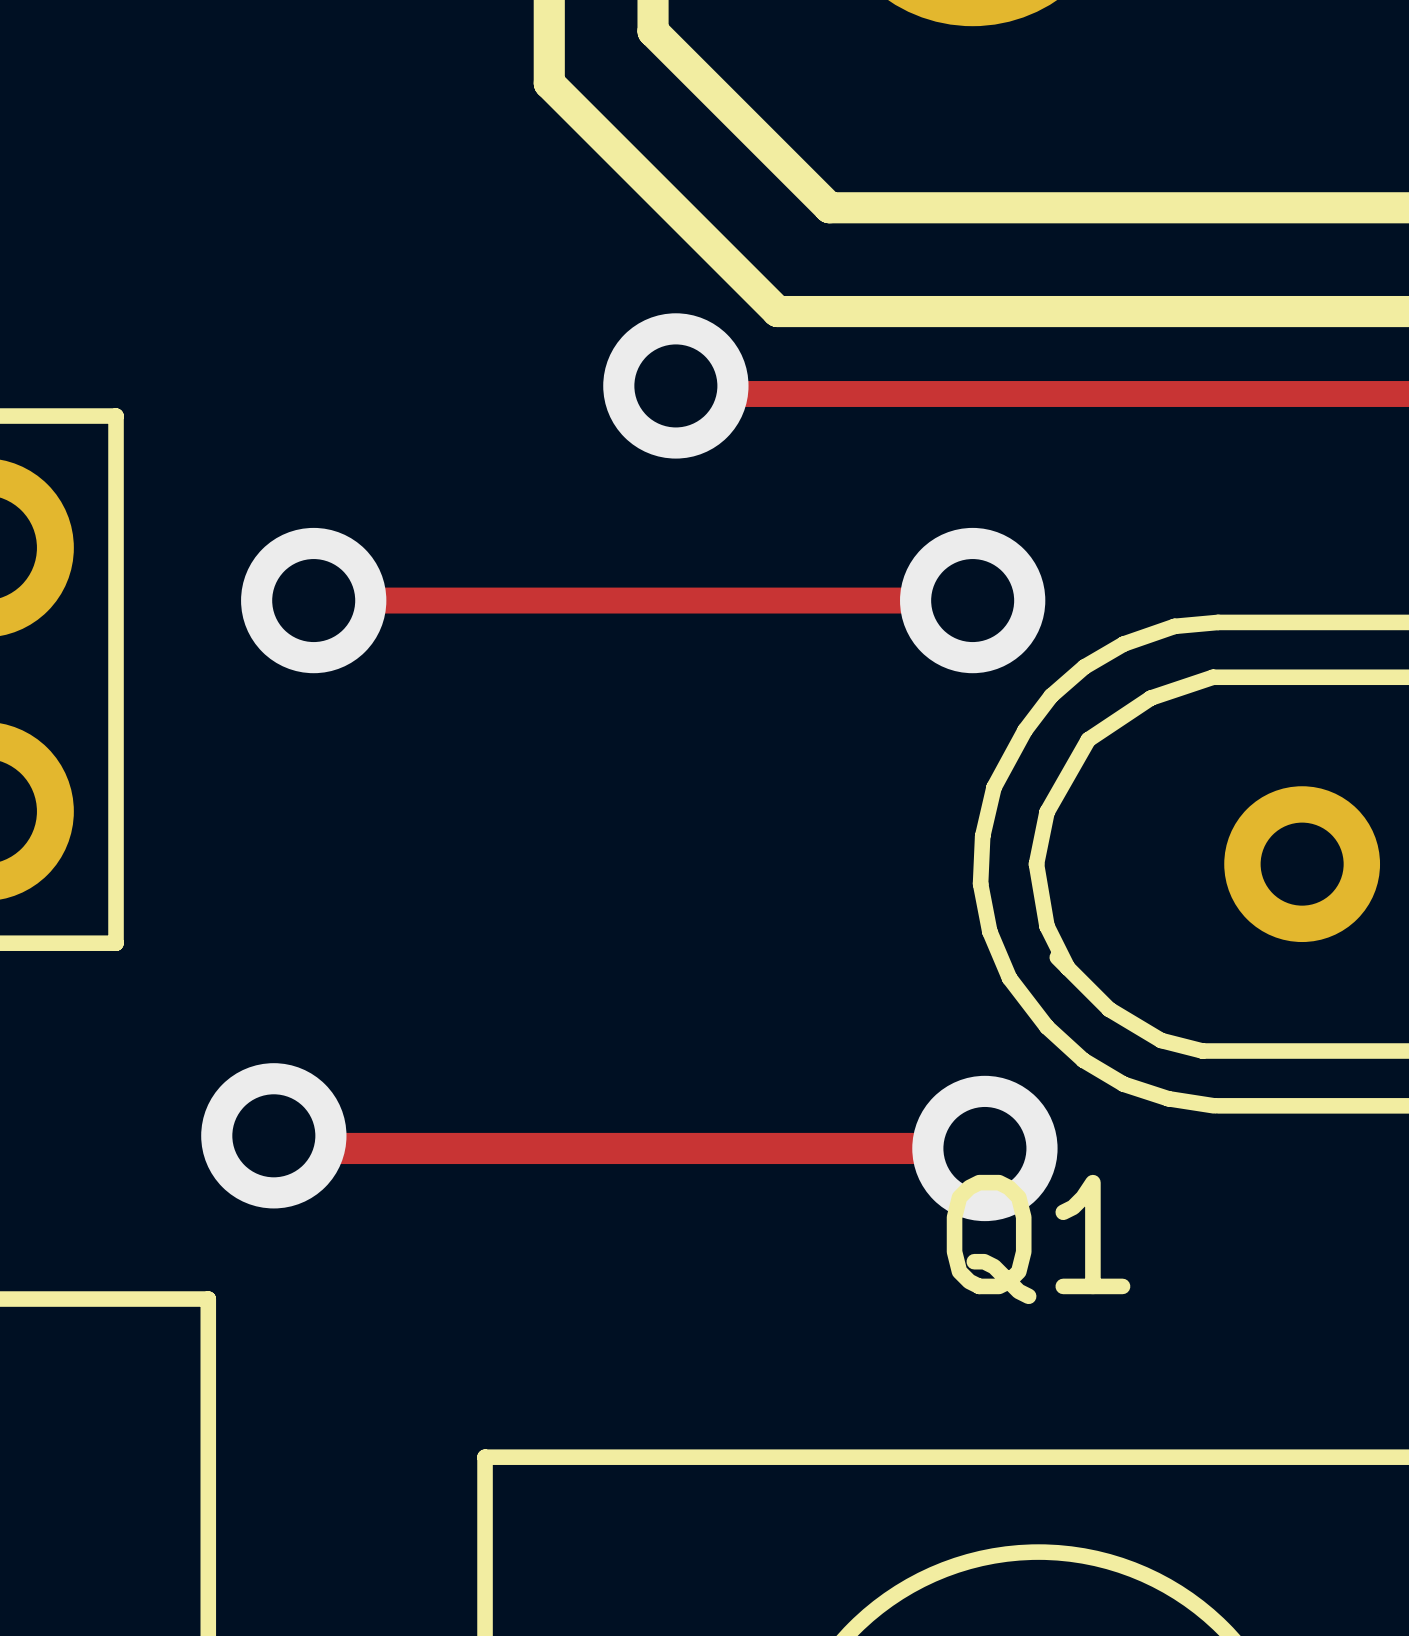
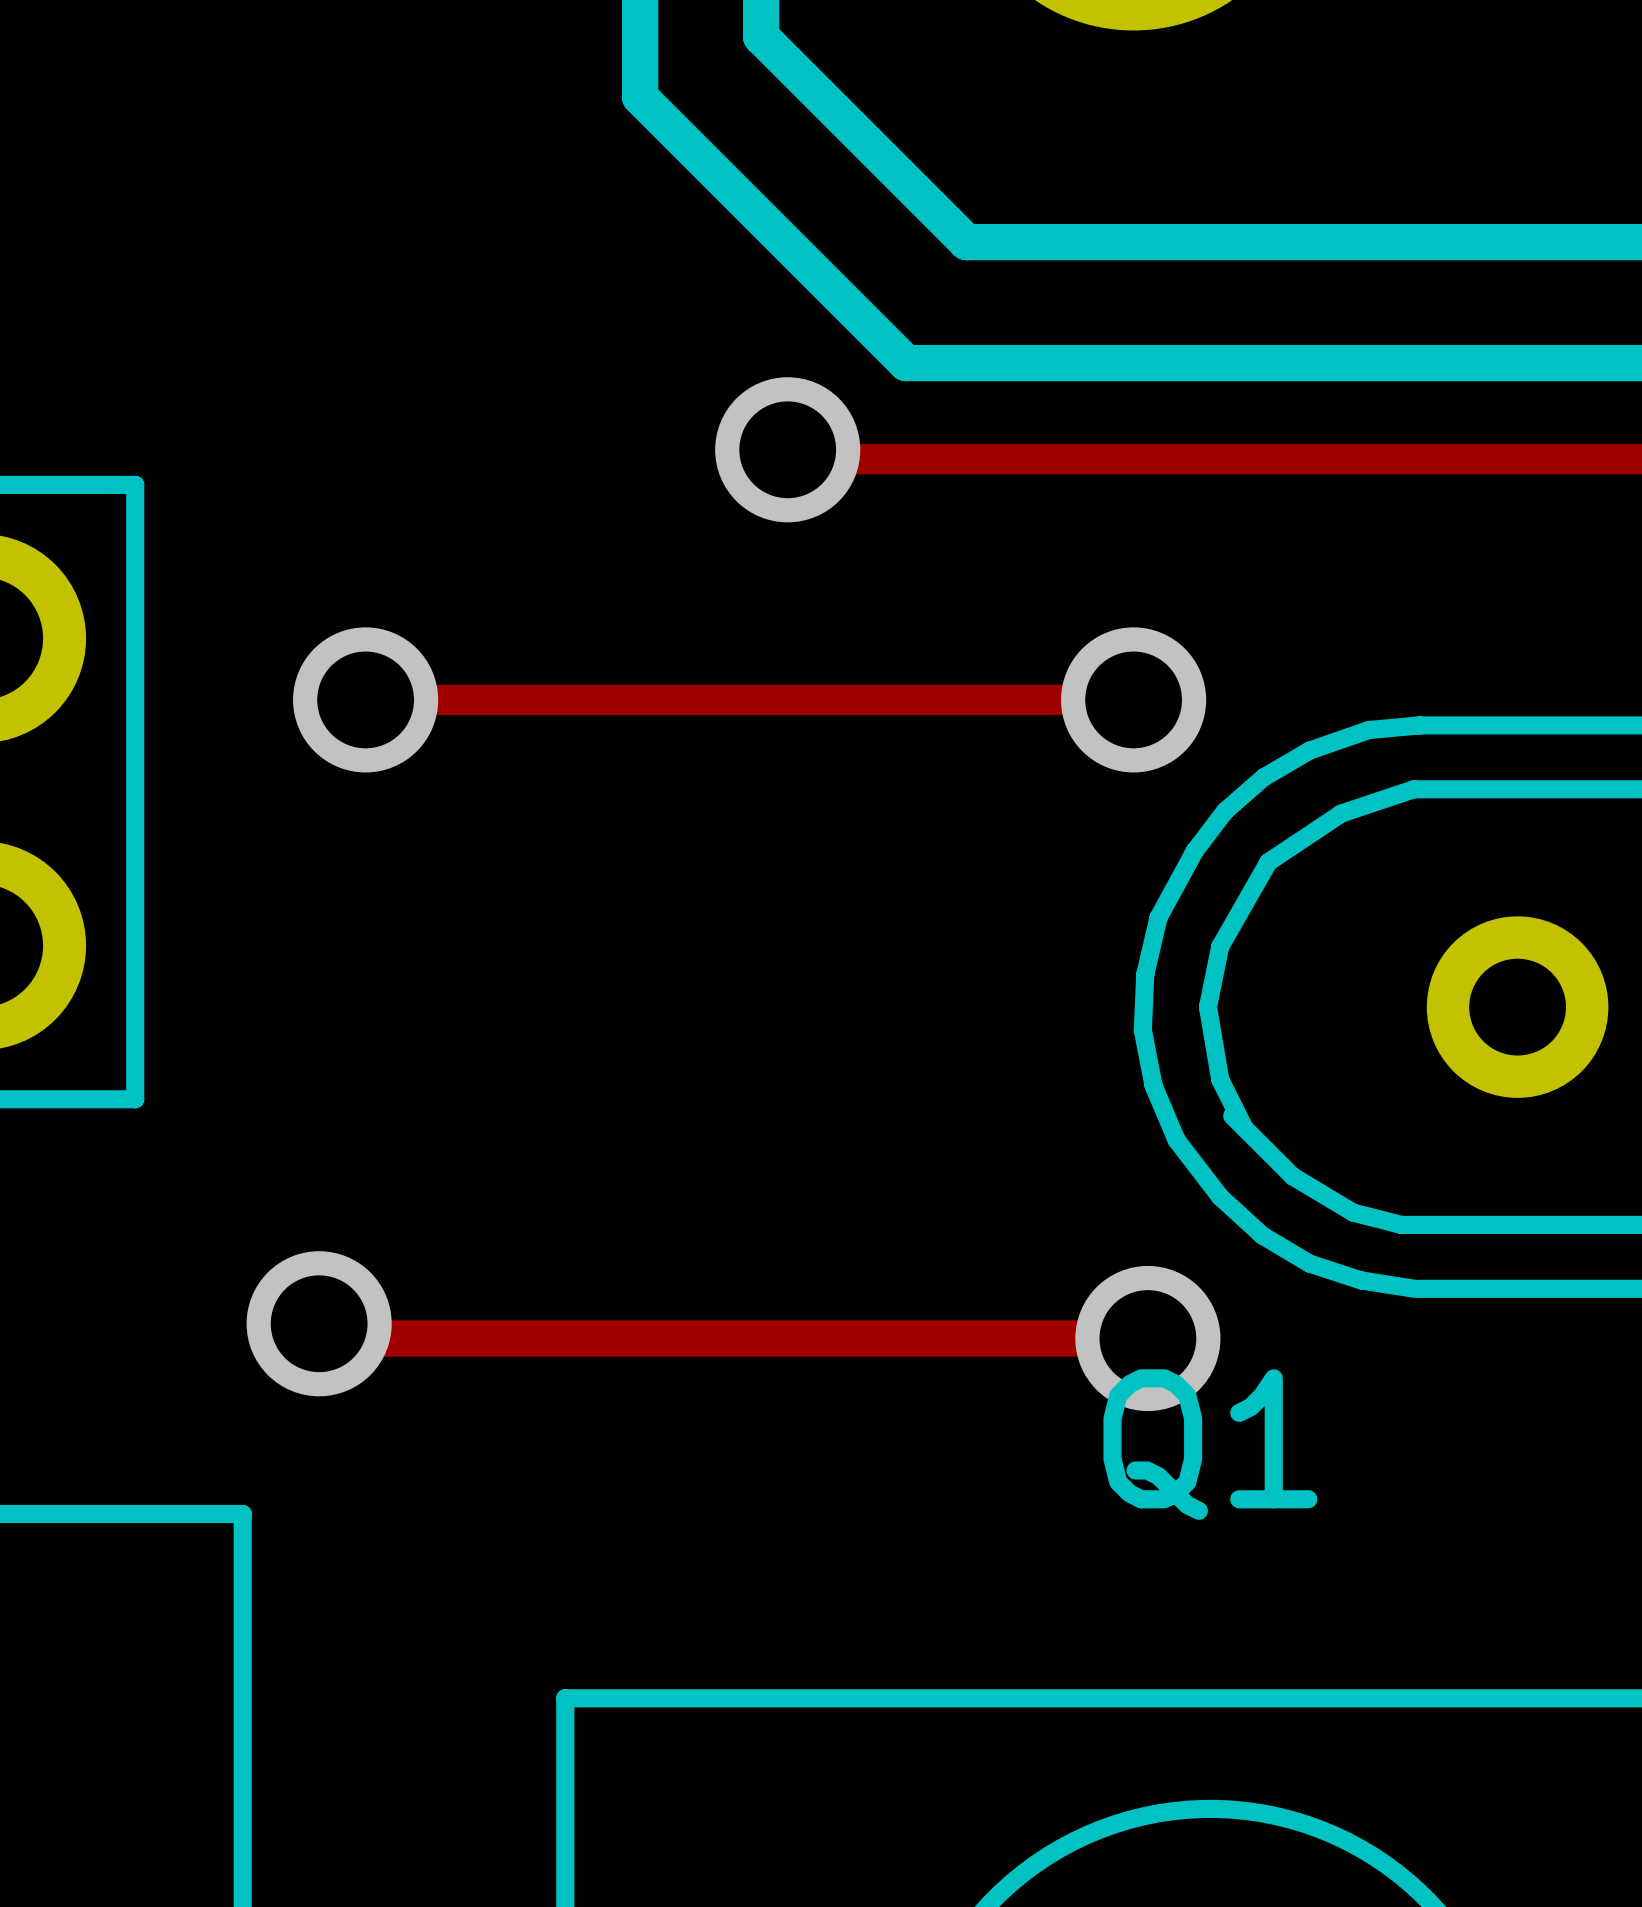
via size: [603, 313, 749, 459] -> [715, 377, 861, 523]
via size: [241, 527, 387, 674] -> [293, 627, 439, 773]
via size: [900, 527, 1046, 674] -> [1061, 627, 1207, 773]
via size: [201, 1063, 347, 1209] -> [246, 1251, 392, 1397]
via size: [912, 1075, 1058, 1222] -> [1075, 1265, 1221, 1412]

